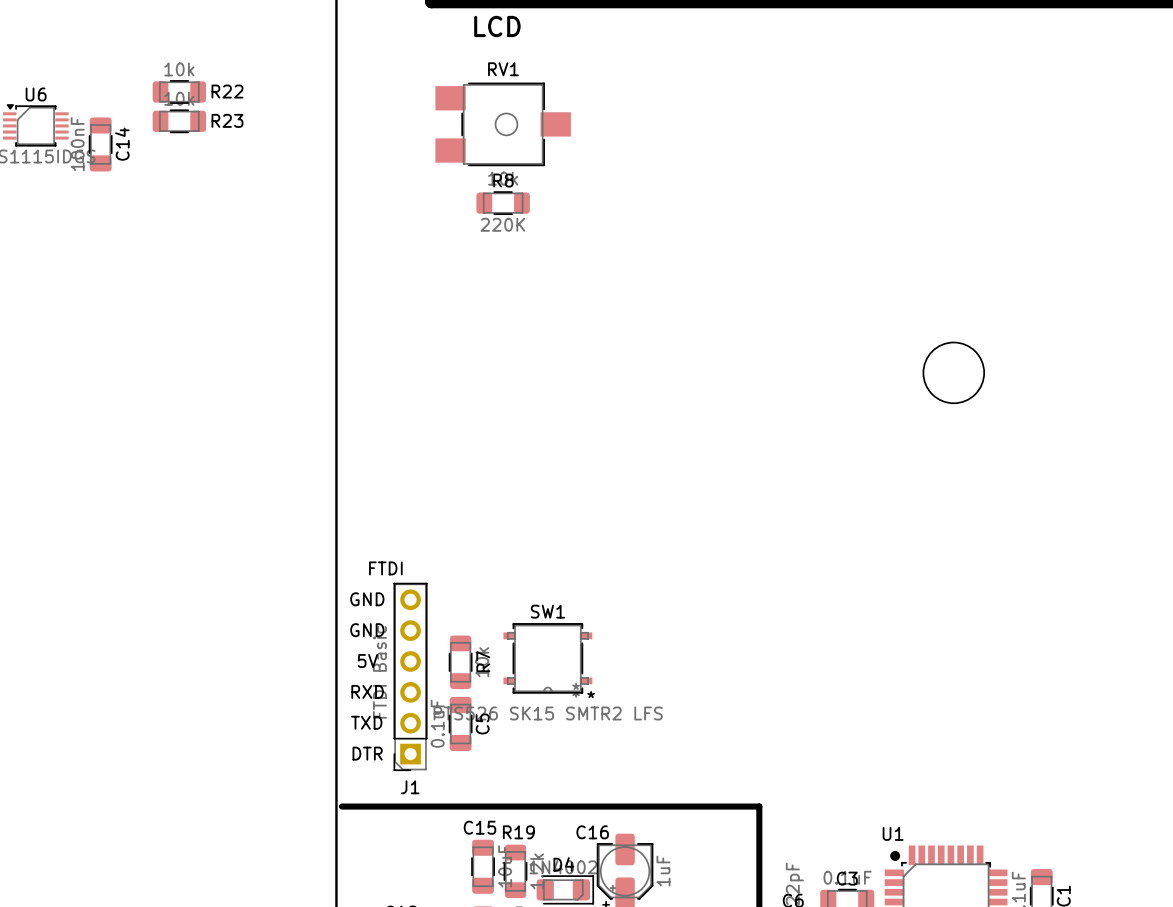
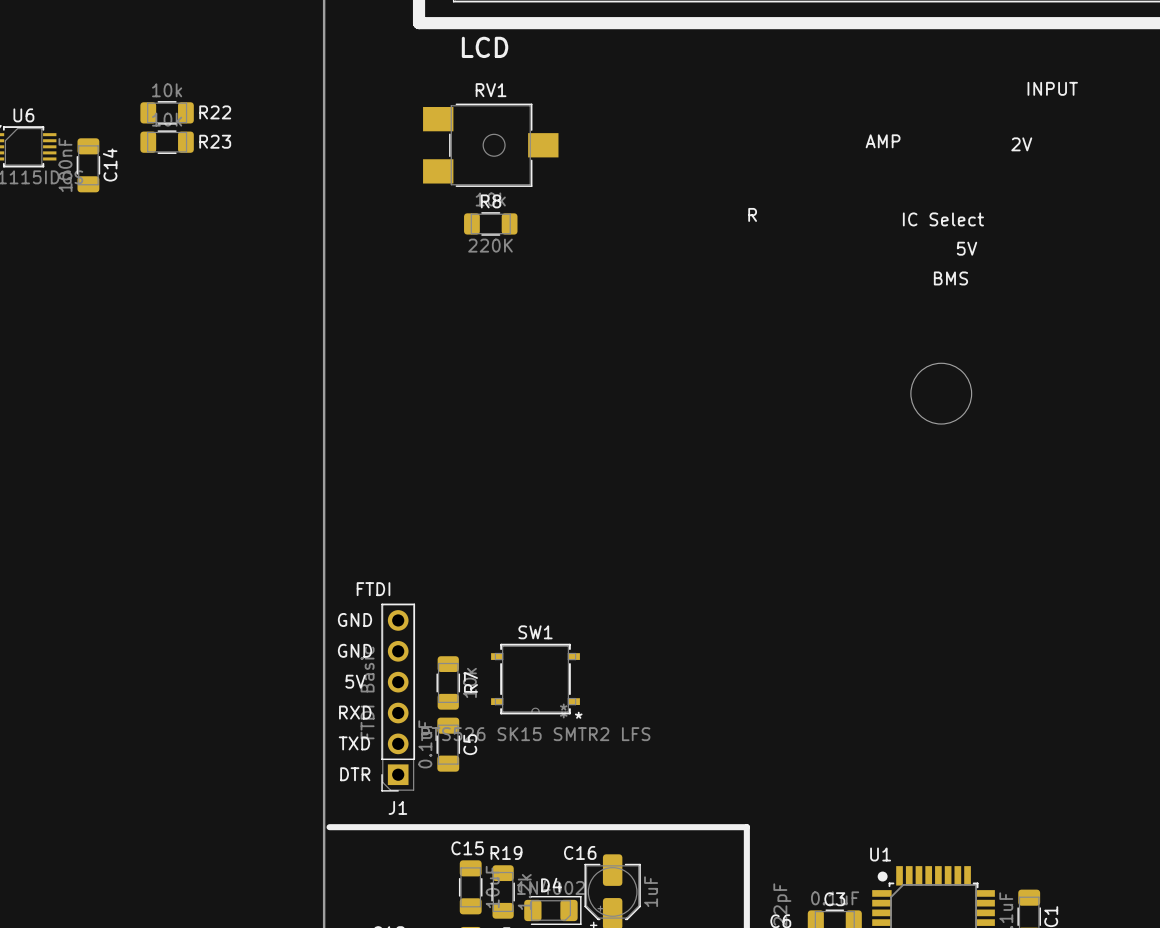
text: none -> INPUT (1052, 88)
text: none -> AMP (883, 141)
text: none -> 2V (1021, 144)
text: none -> R (752, 214)
text: none -> IC Select (943, 219)
text: none -> 5V (967, 248)
text: none -> BMS (950, 278)

